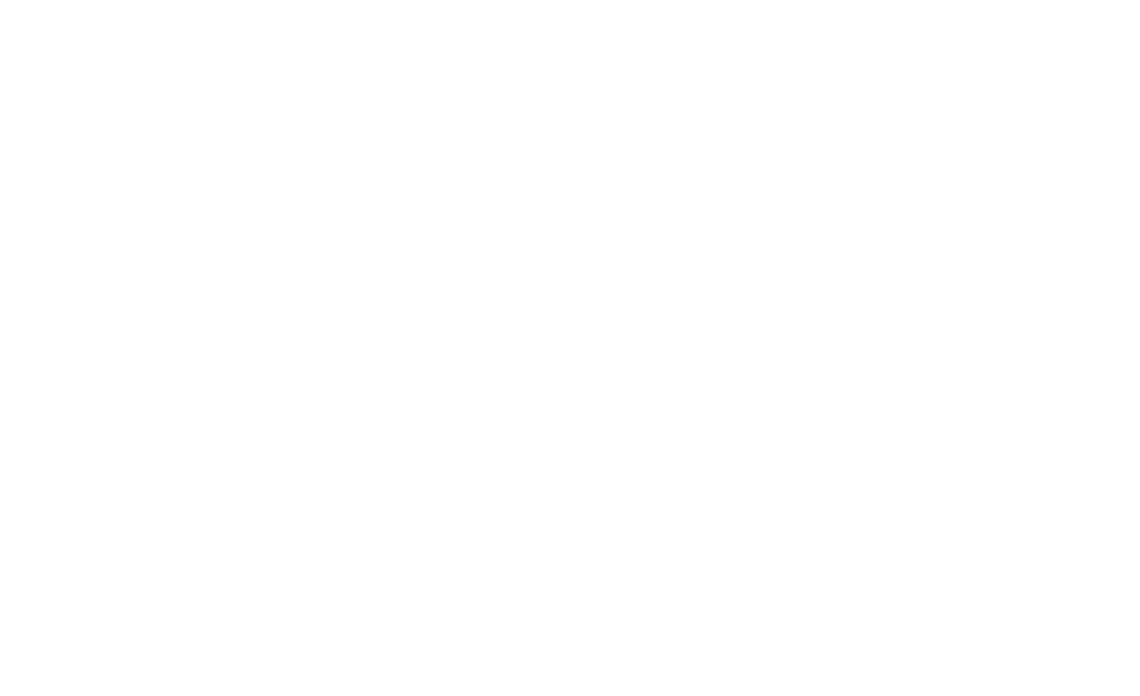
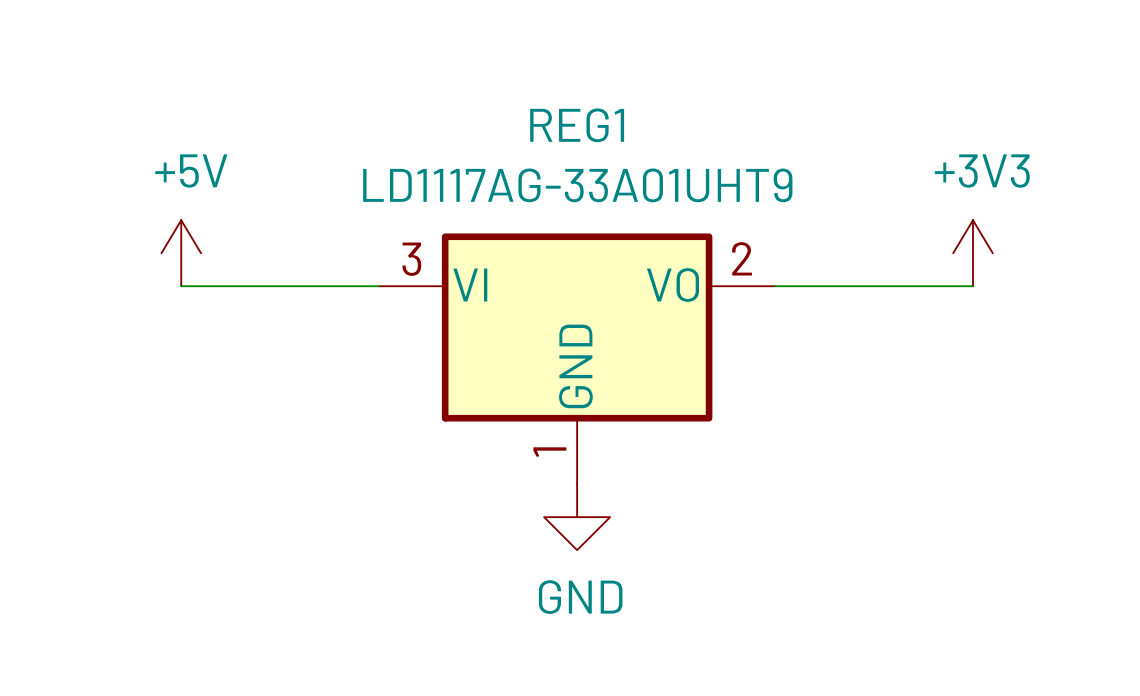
power symbol: none -> +5V (181, 253)
power symbol: none -> +3V3 (973, 253)
wire: none -> (181, 286) (379, 286)
wire: none -> (775, 286) (973, 286)
REG1: none -> LD1117AG-33A01UHT9 (577, 358)
power symbol: none -> GND (577, 517)

